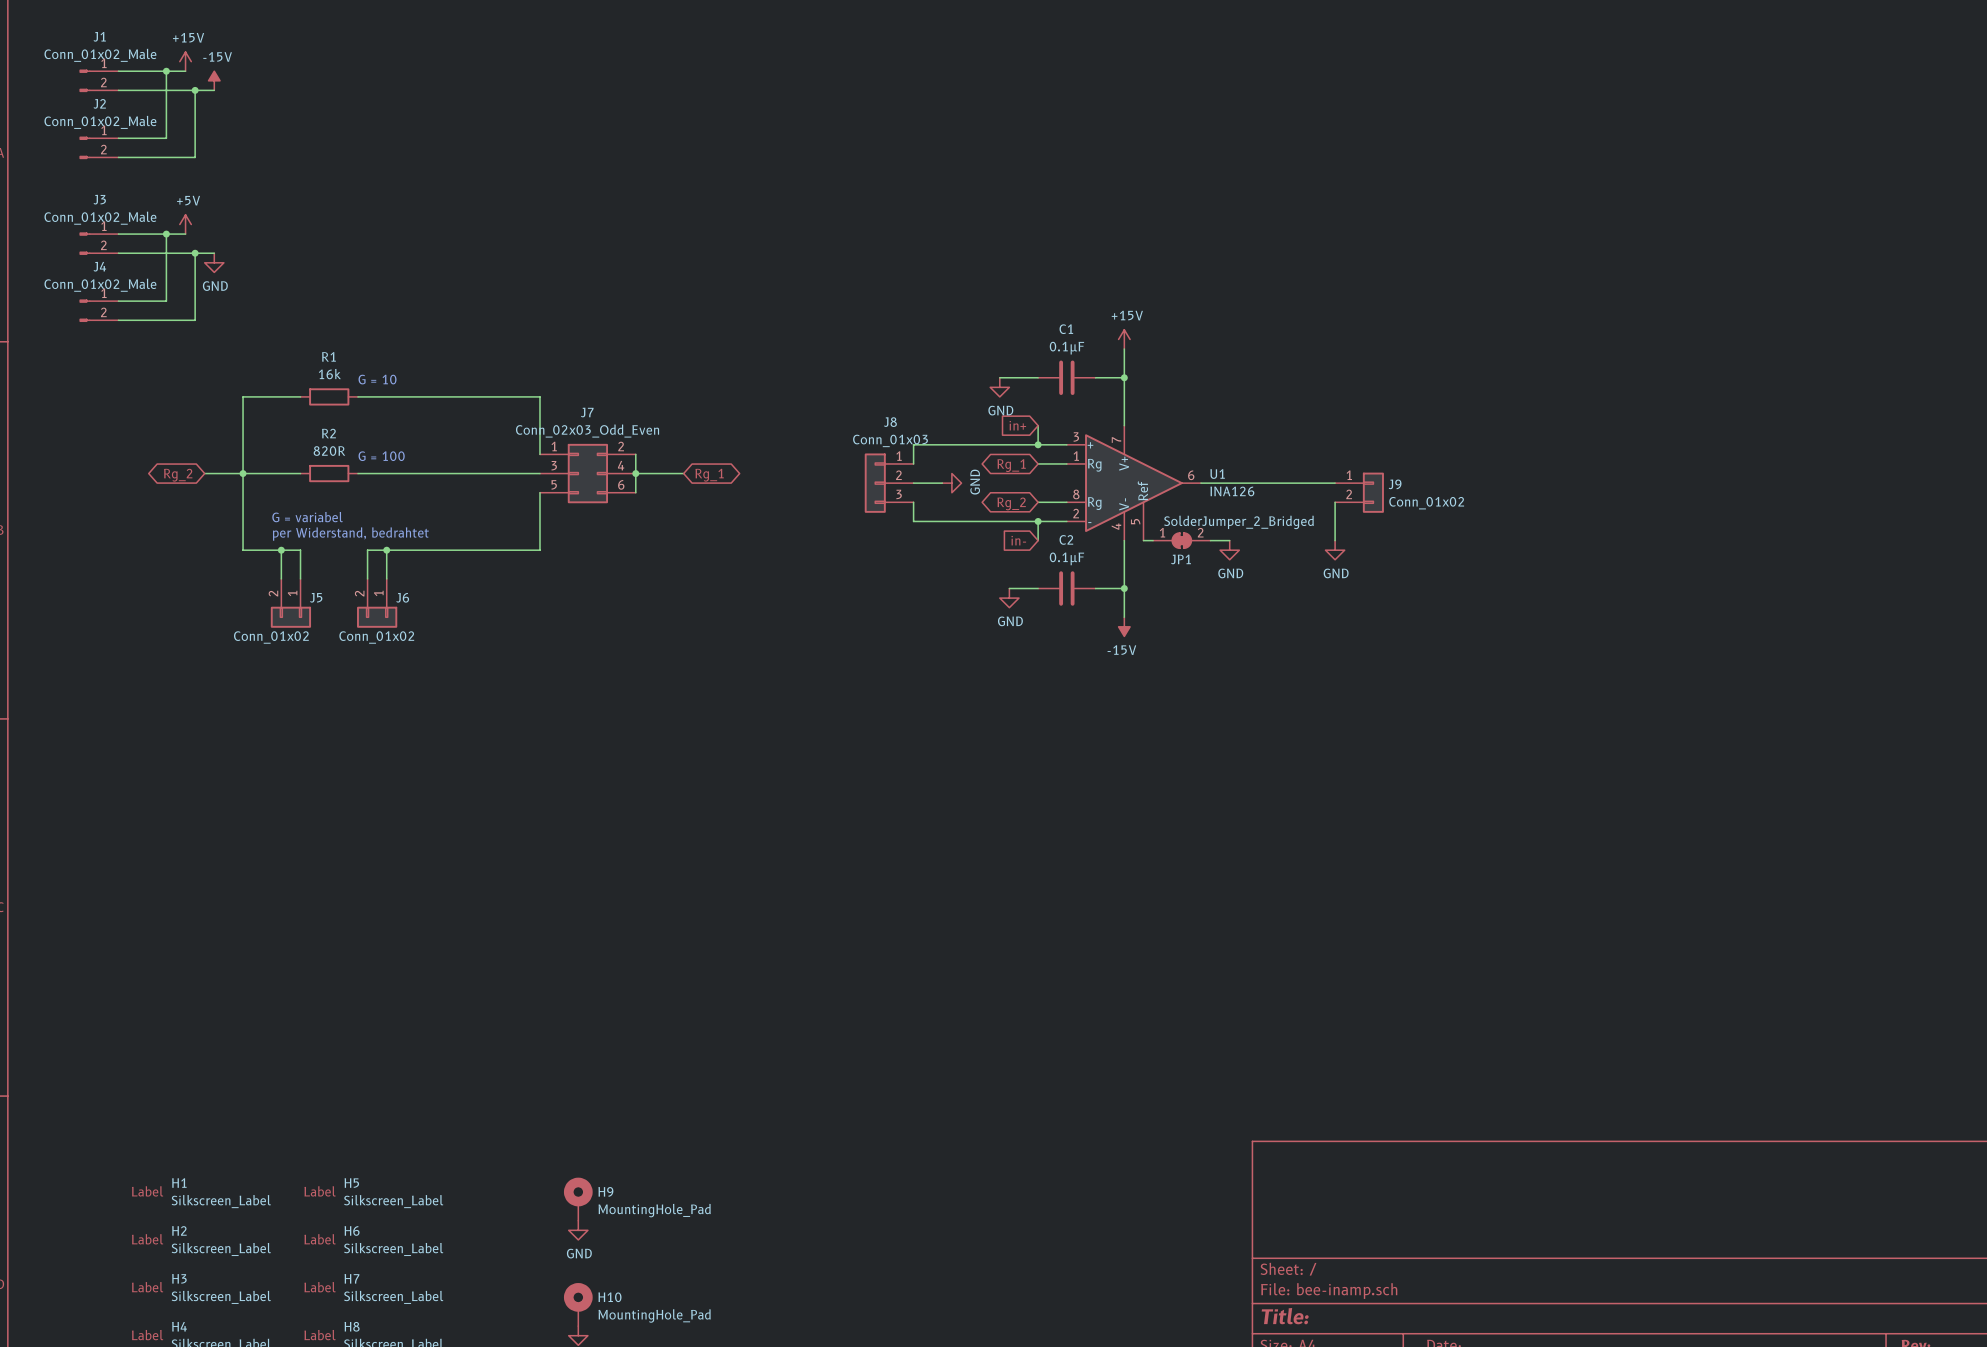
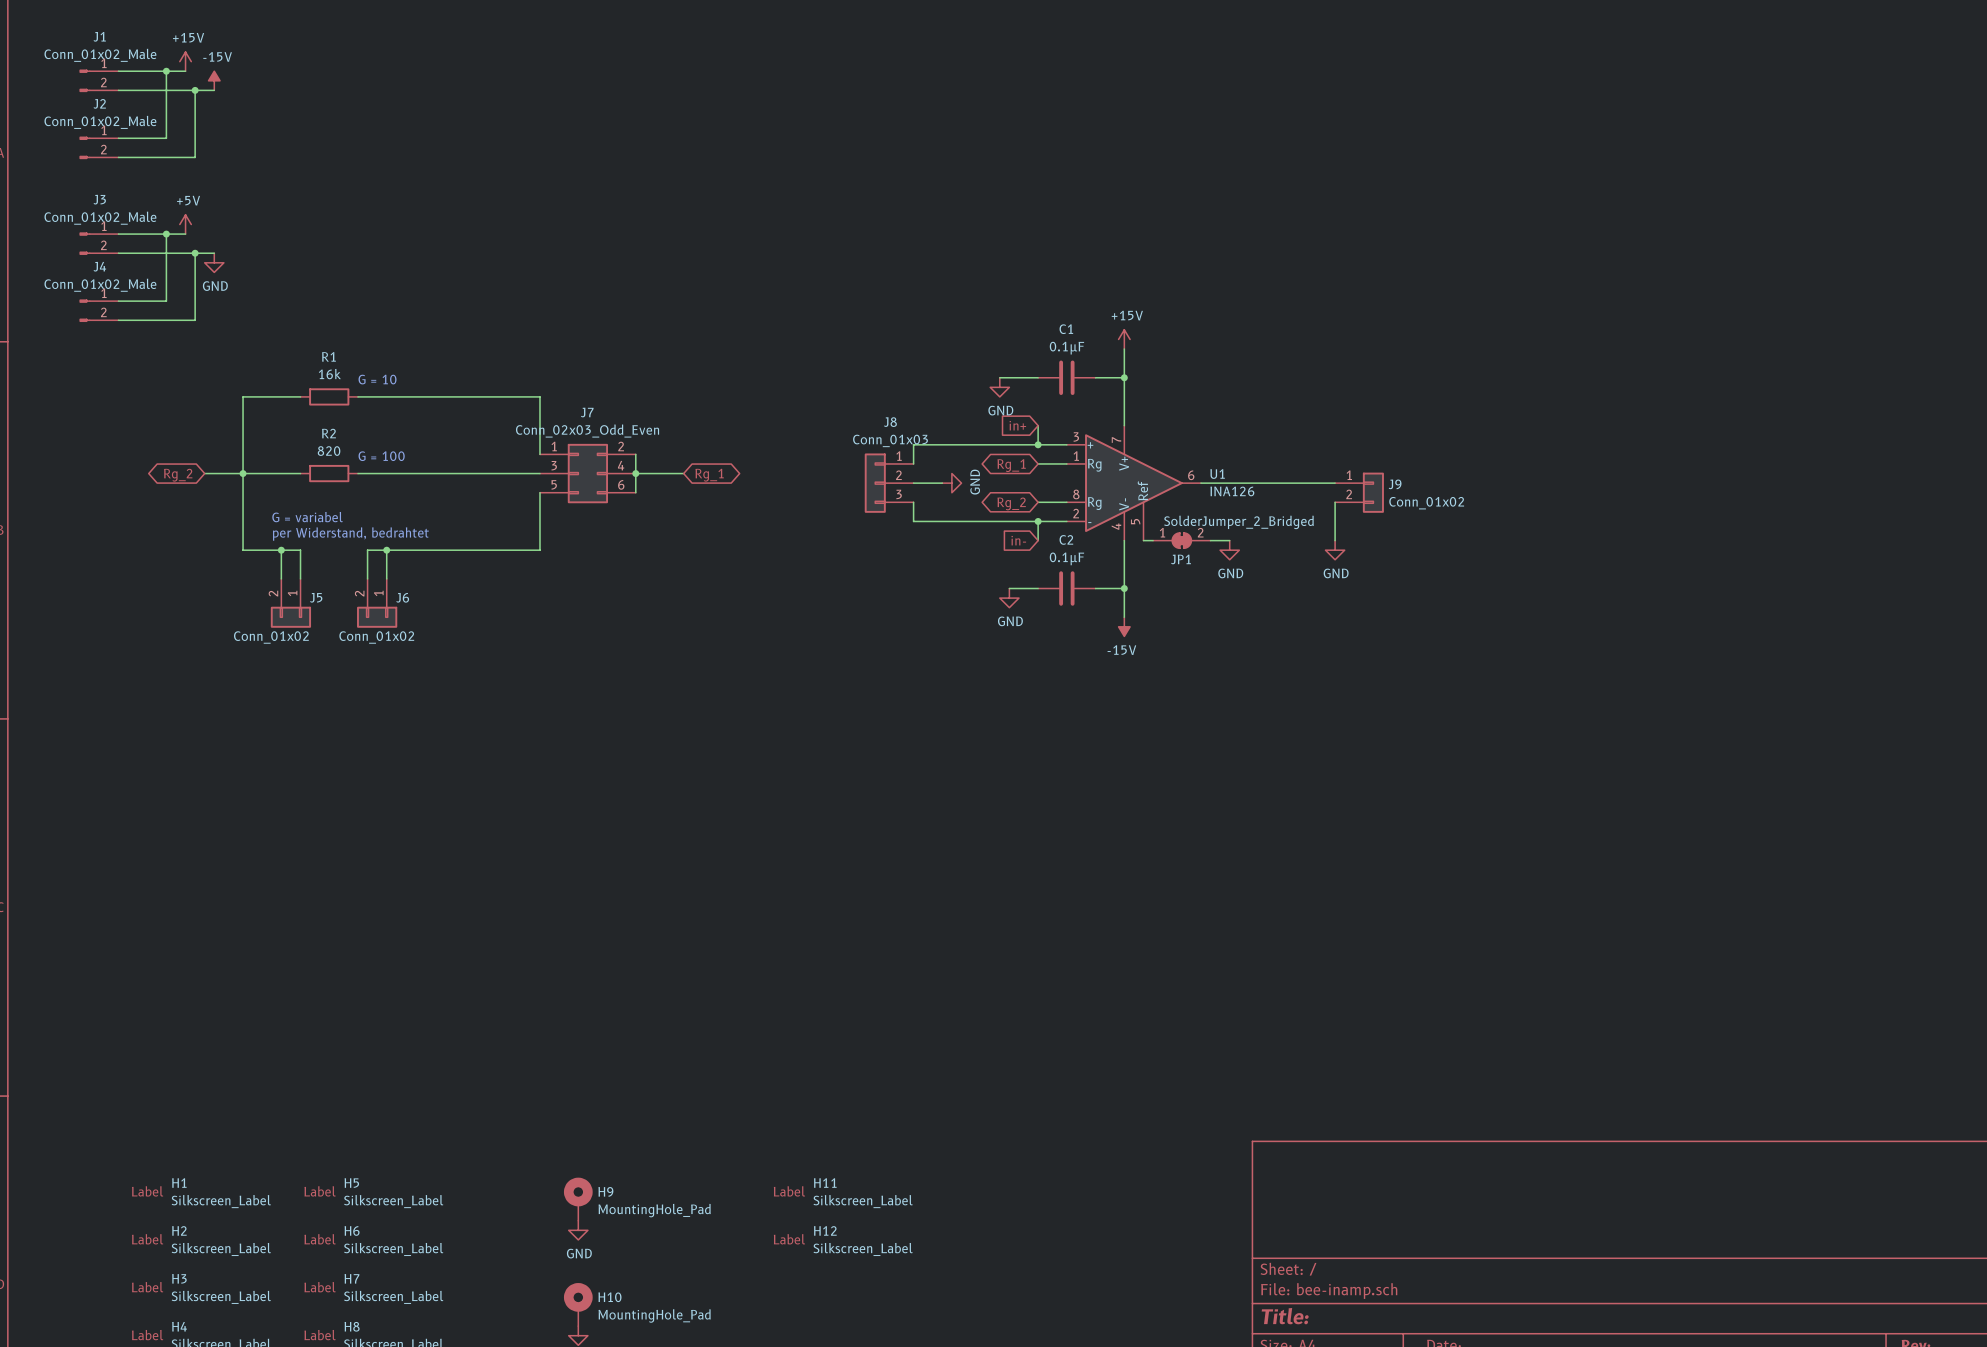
R2 value: 820R (329, 451) -> 820 (329, 451)
H11: none -> Silkscreen_Label (843, 1193)
H12: none -> Silkscreen_Label (843, 1241)

